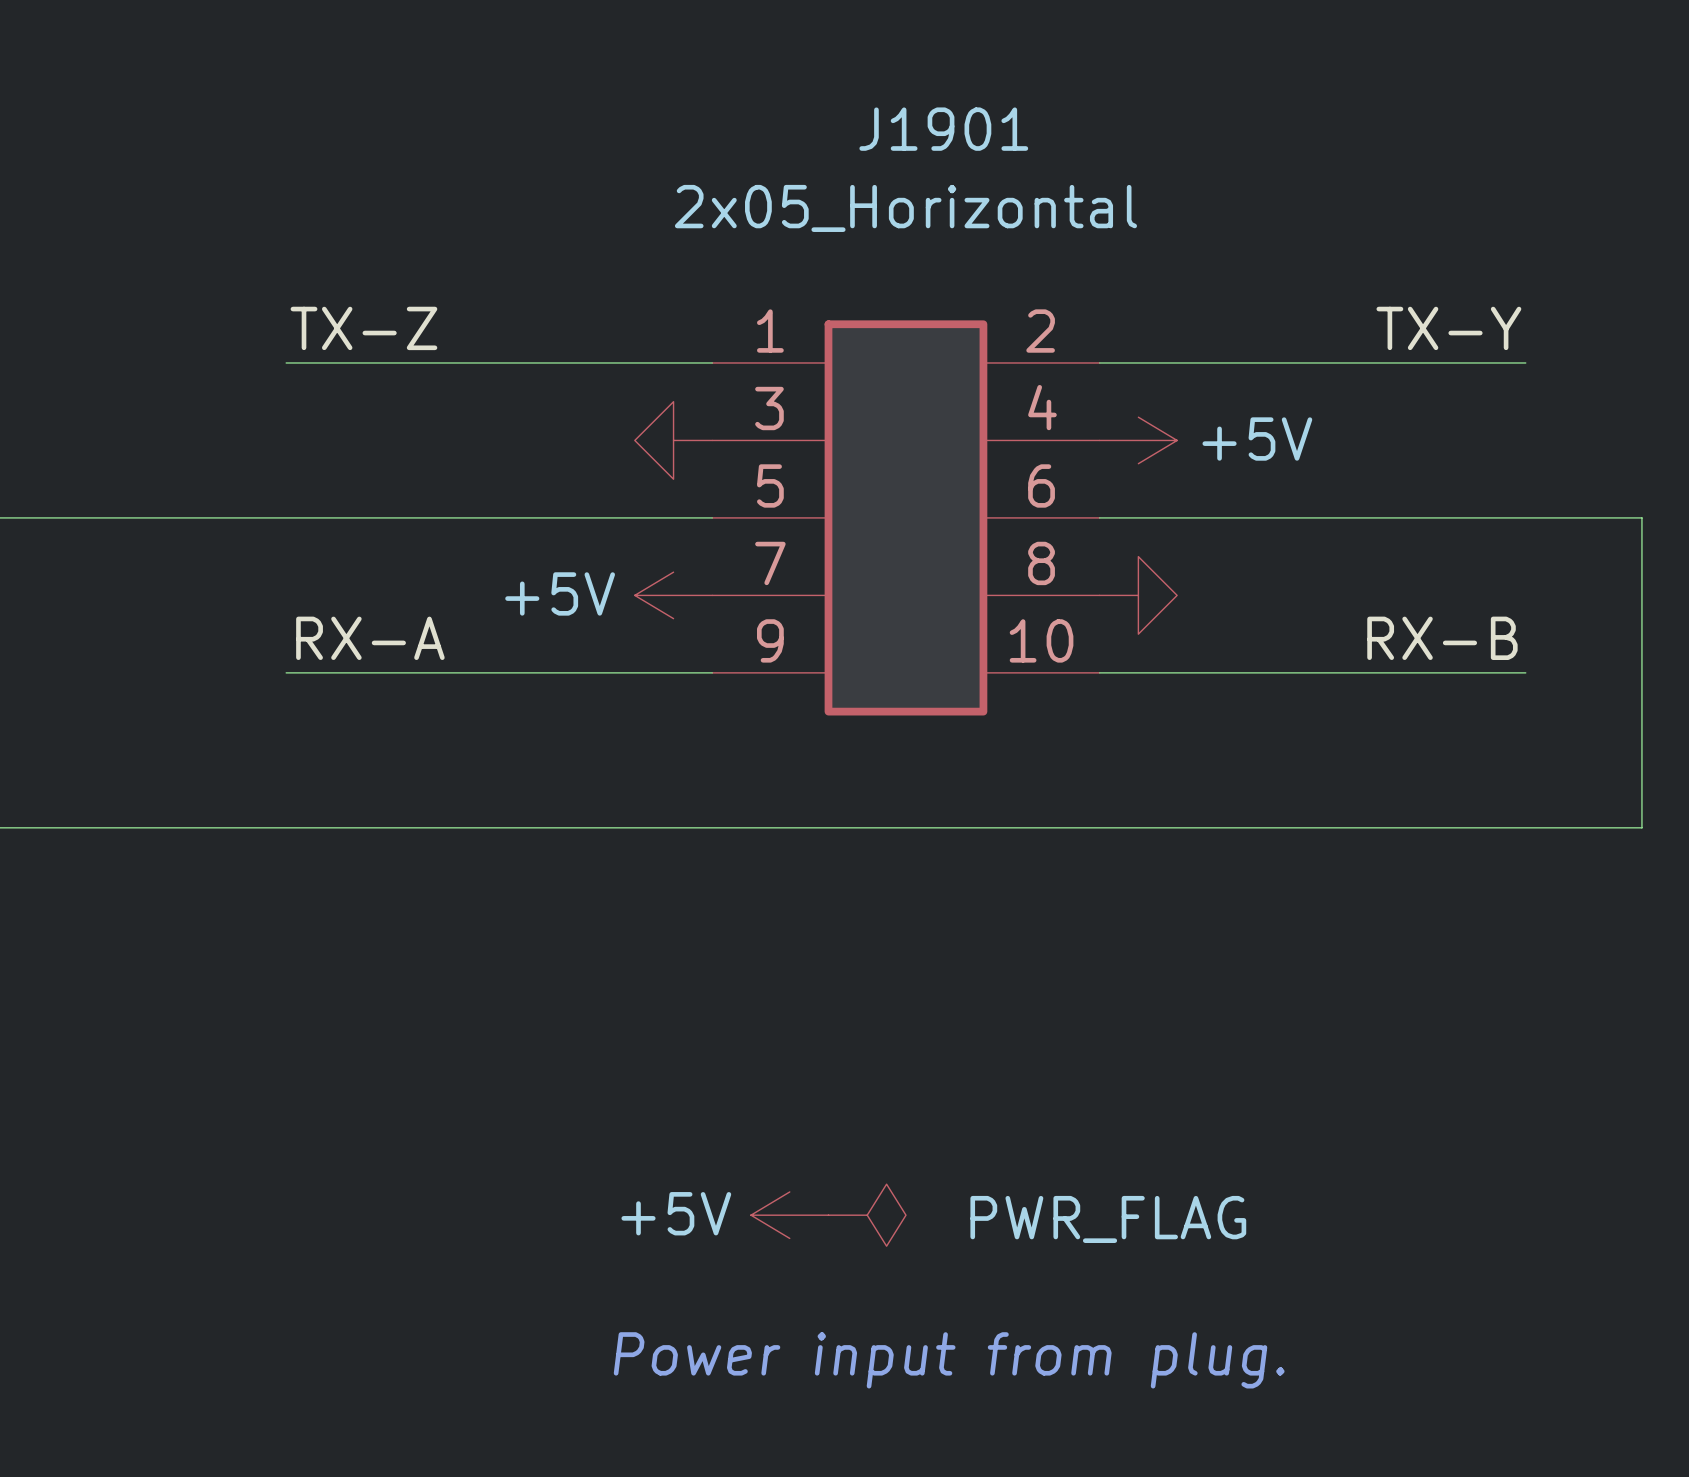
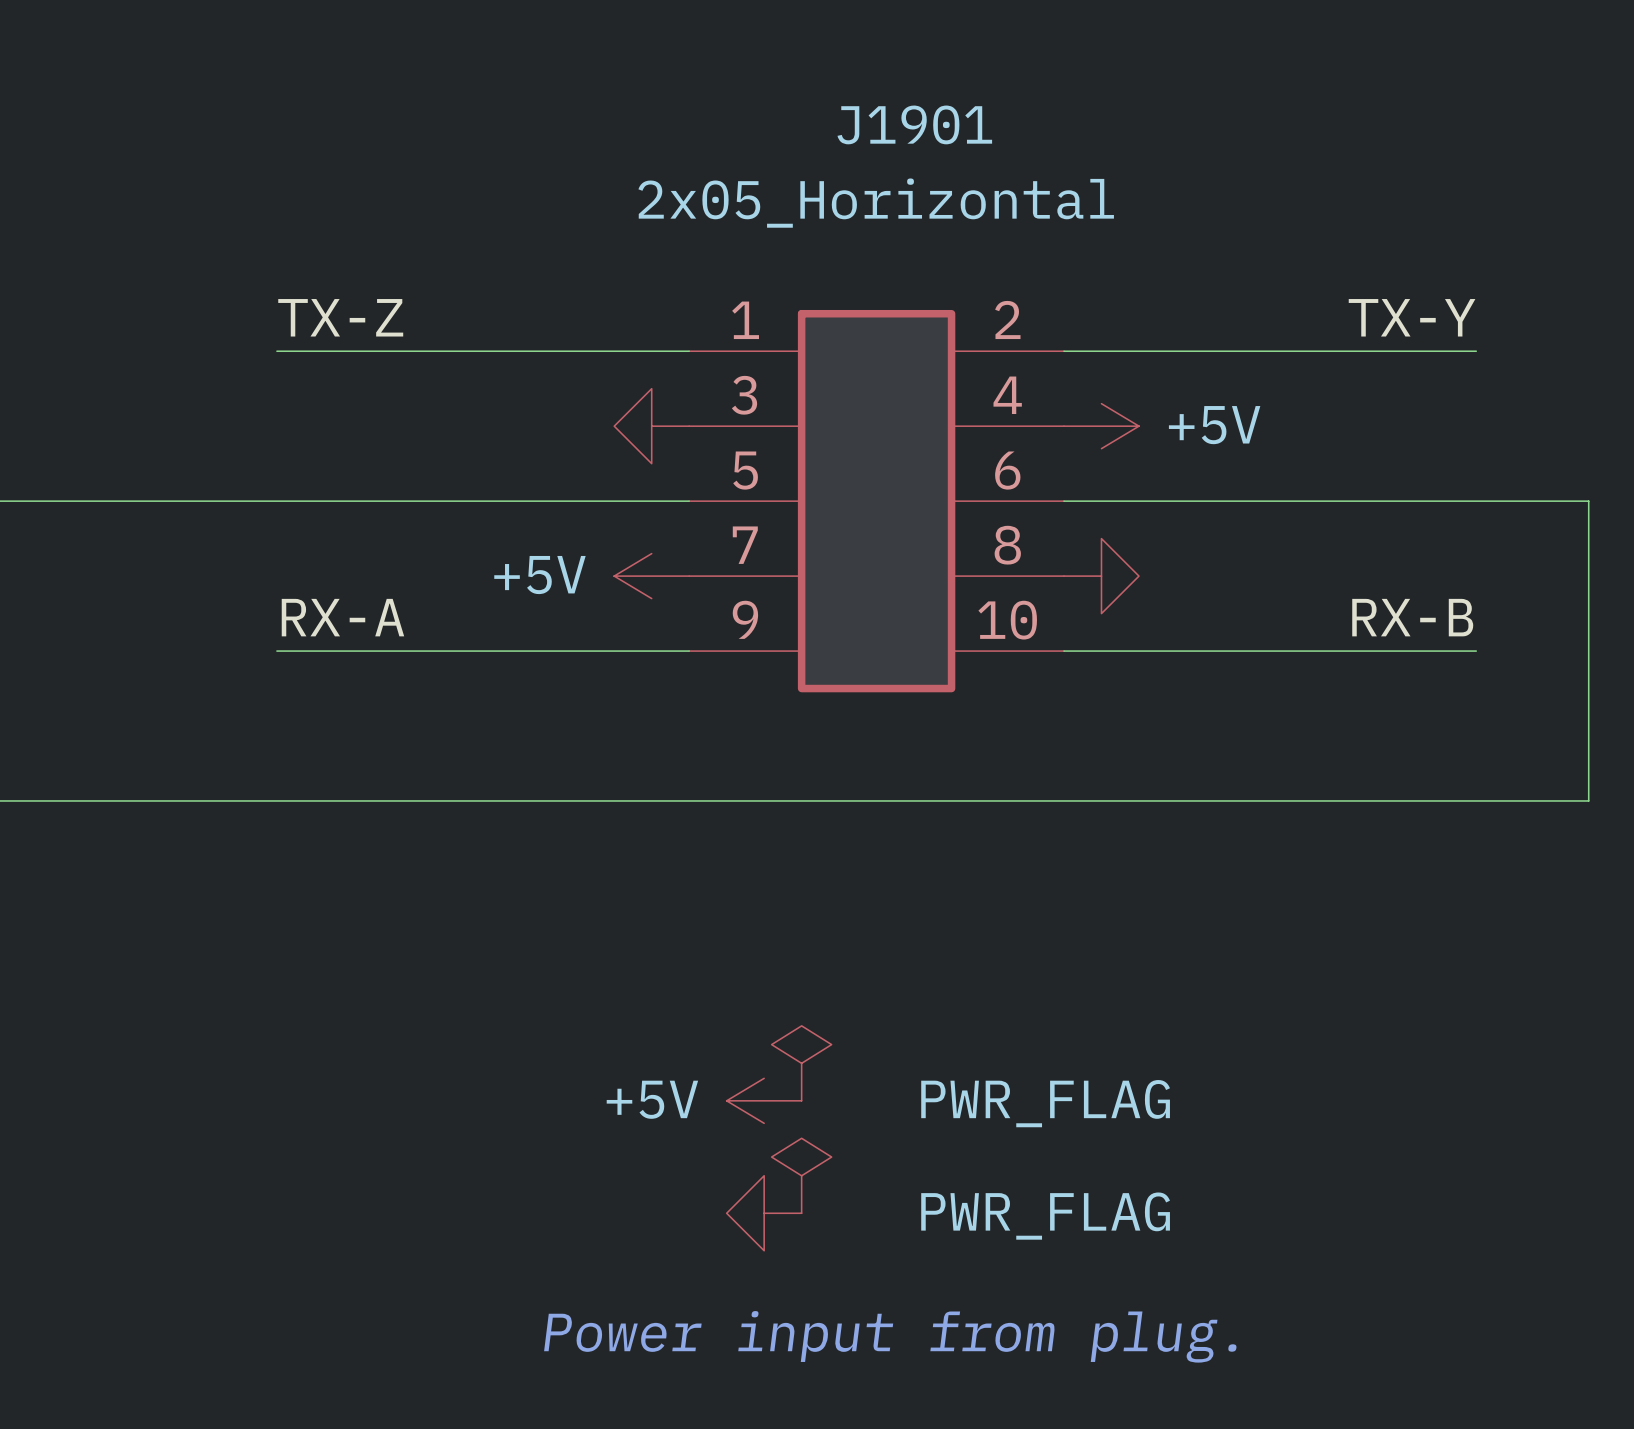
power symbol: none -> PWR_FLAG (801, 1063)
power symbol position: +5V (789, 1215) -> +5V (764, 1100)
power symbol rotation: 0° (867, 1215) -> 90° counterclockwise (801, 1175)
power symbol: none -> (764, 1213)
text position: Power input from plug. (949, 1360) -> Power input from plug. (890, 1336)

